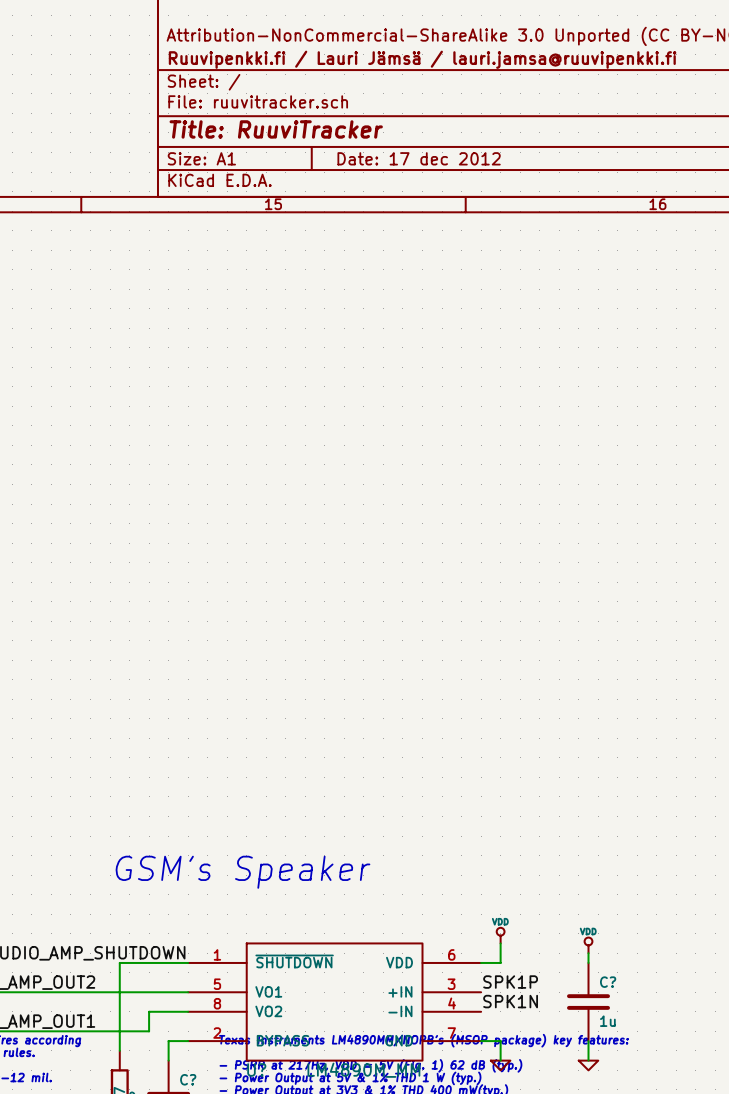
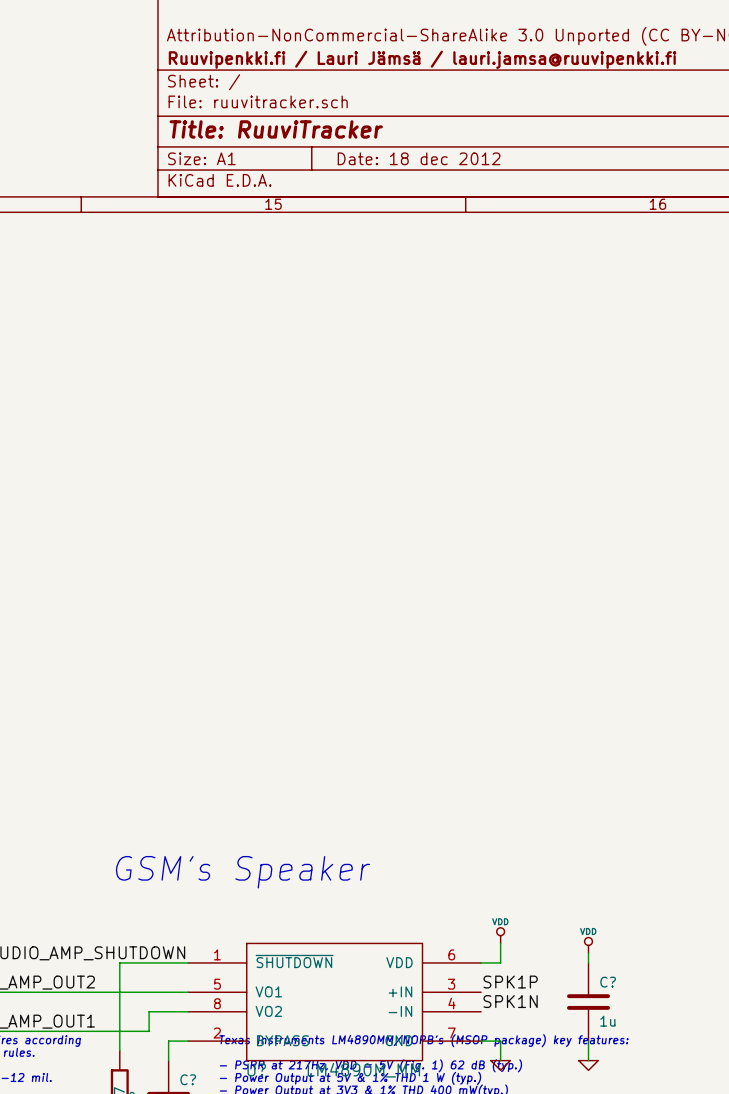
title block: Date: 17 dec 2012 (419, 158) -> Date: 18 dec 2012 (419, 158)

